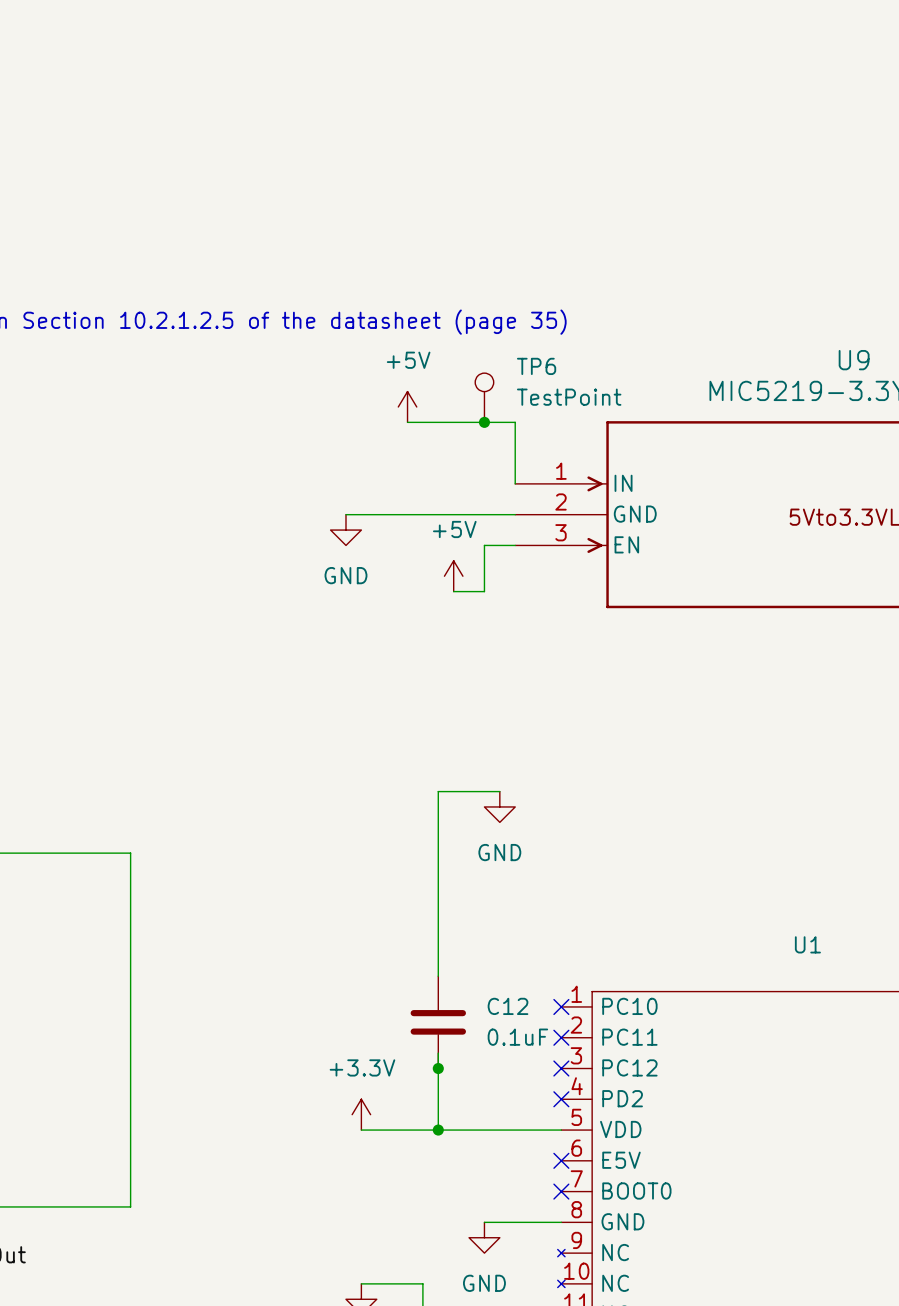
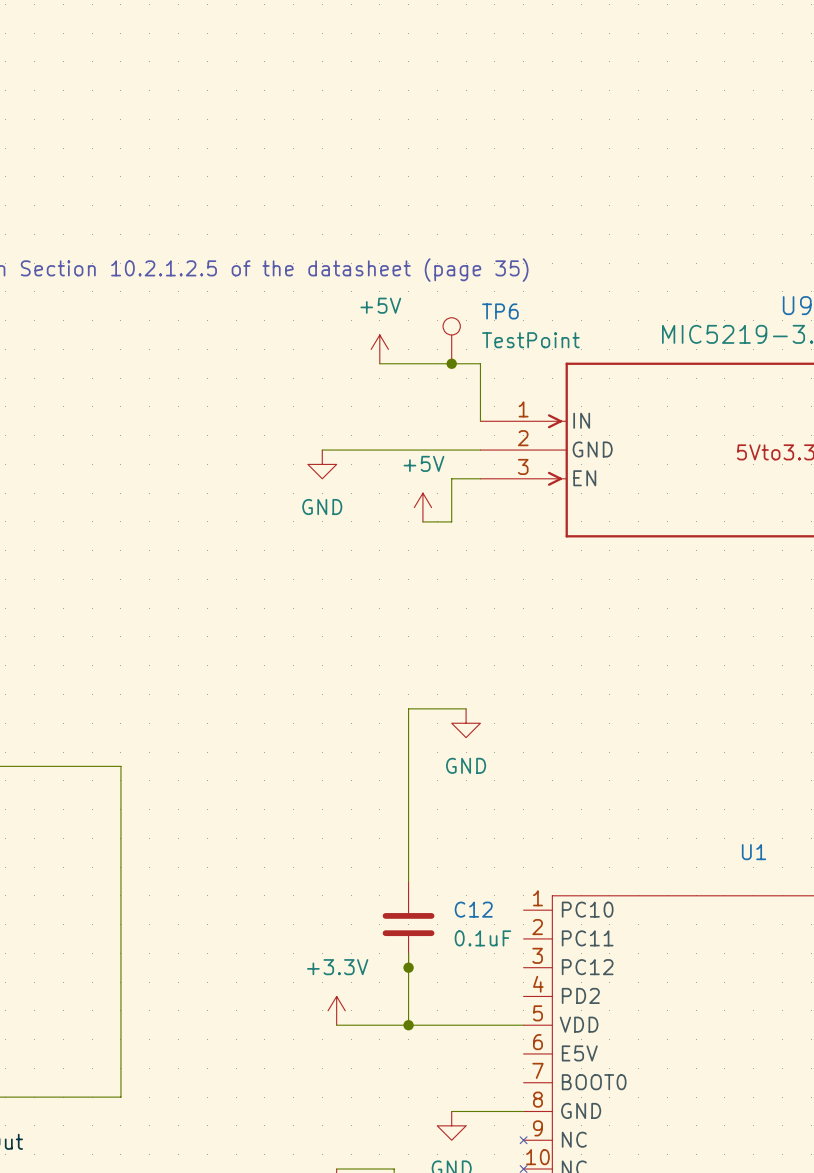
no-connect mark: (561, 1006) -> none
no-connect mark: (561, 1037) -> none
no-connect mark: (561, 1068) -> none
no-connect mark: (561, 1099) -> none
no-connect mark: (561, 1160) -> none
no-connect mark: (561, 1191) -> none

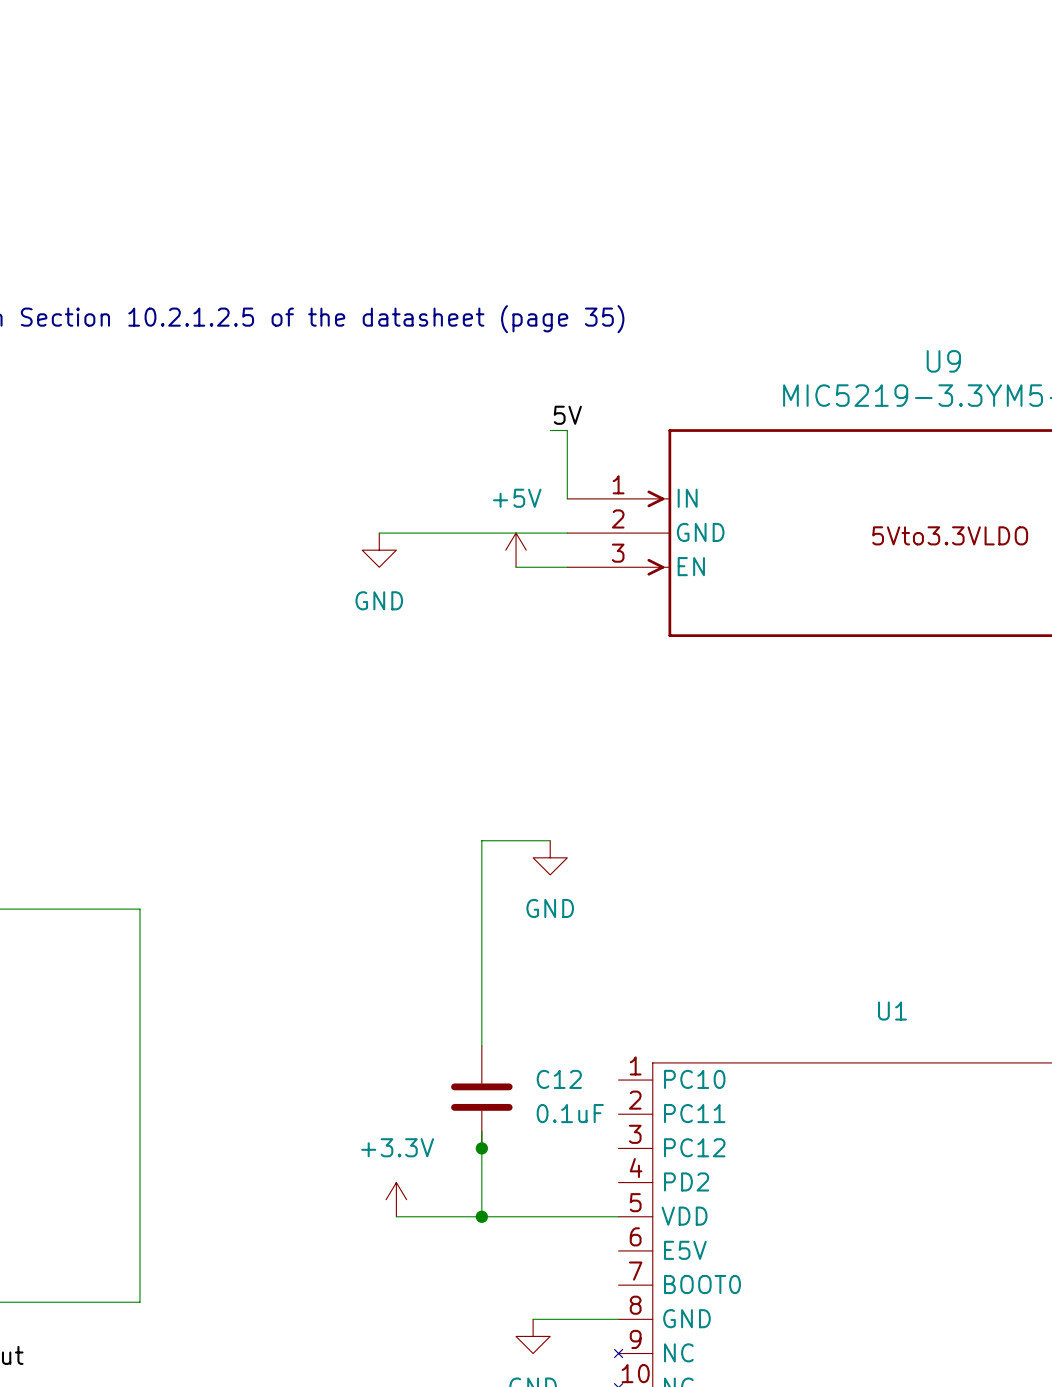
TP6: TestPoint (451, 340) -> none
power symbol: +5V (379, 349) -> none
label: none -> 5V (567, 415)
wire: (379, 363) (466, 363) -> none
junction: (451, 363) -> none
wire: (451, 478) (451, 521) (422, 521) -> (533, 567) (516, 567)
power symbol position: +5V (422, 507) -> +5V (516, 550)

